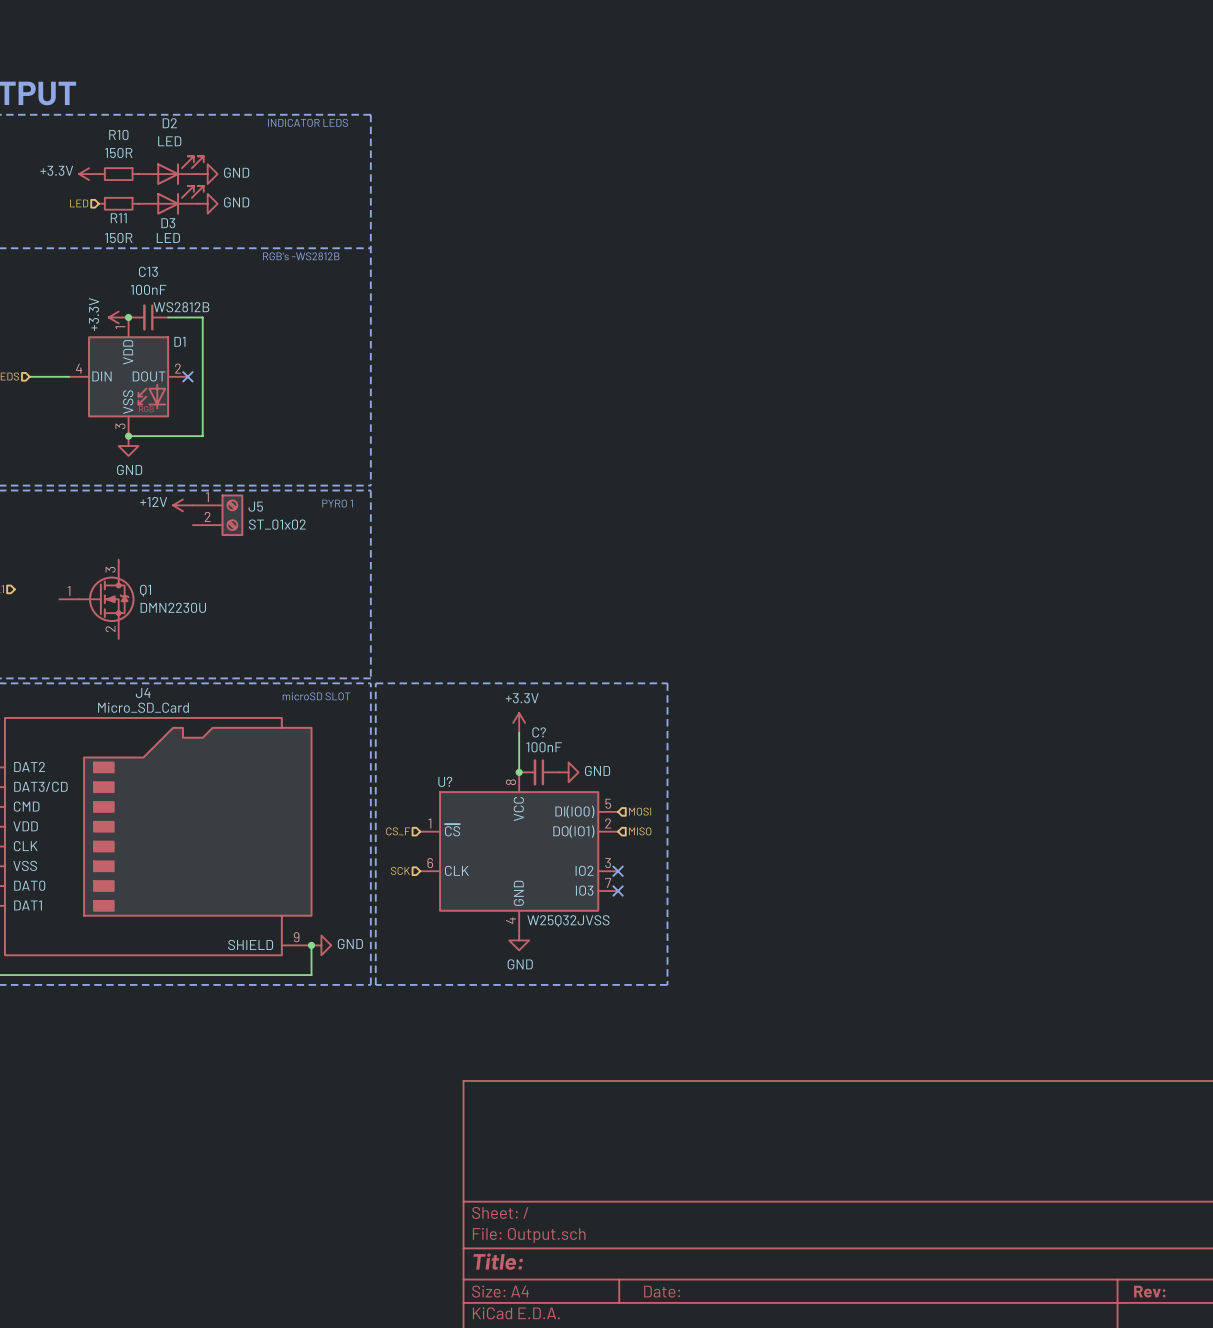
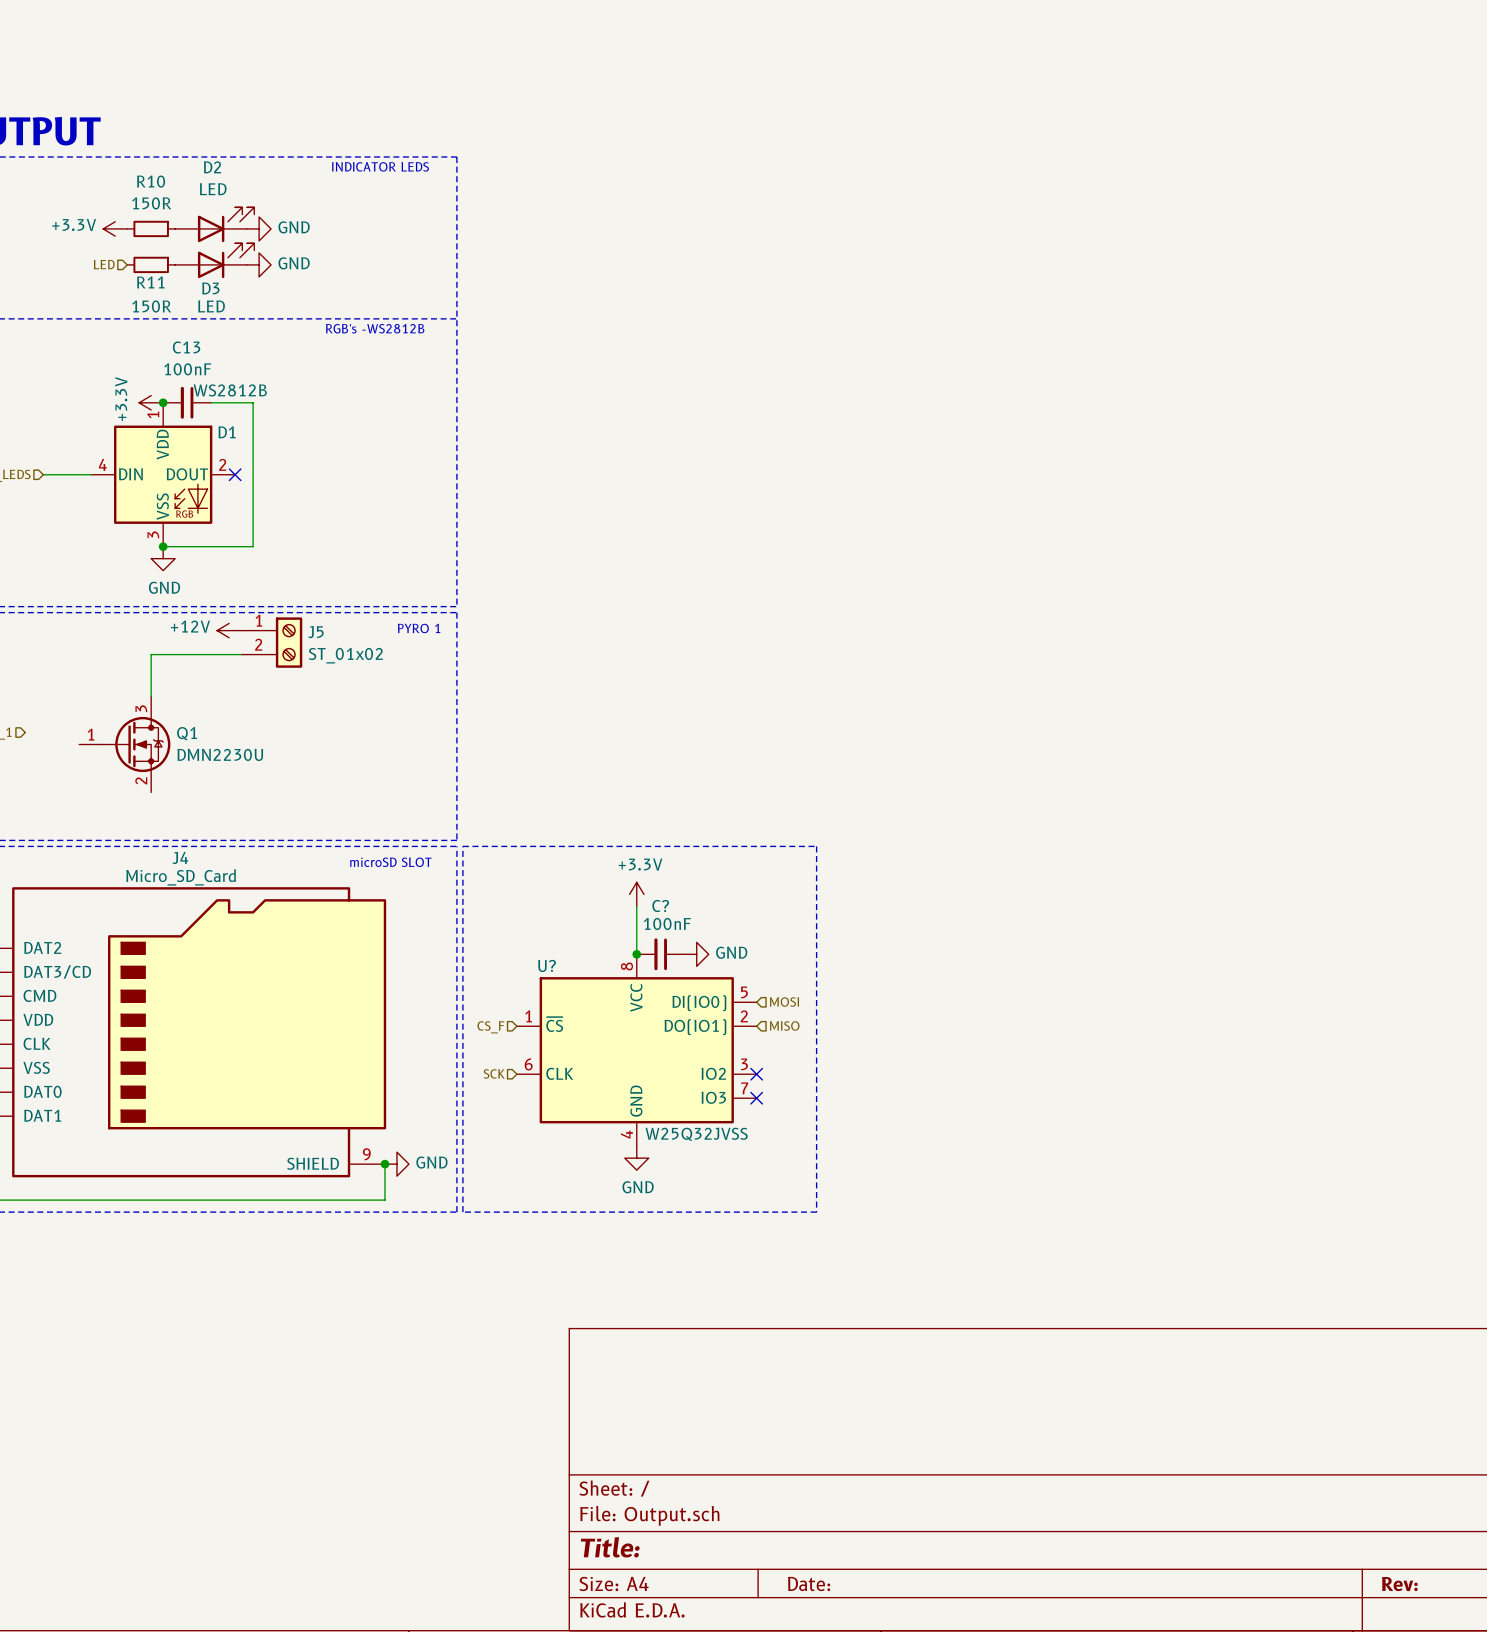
wire: none -> (241, 654) (151, 654) (151, 696)

